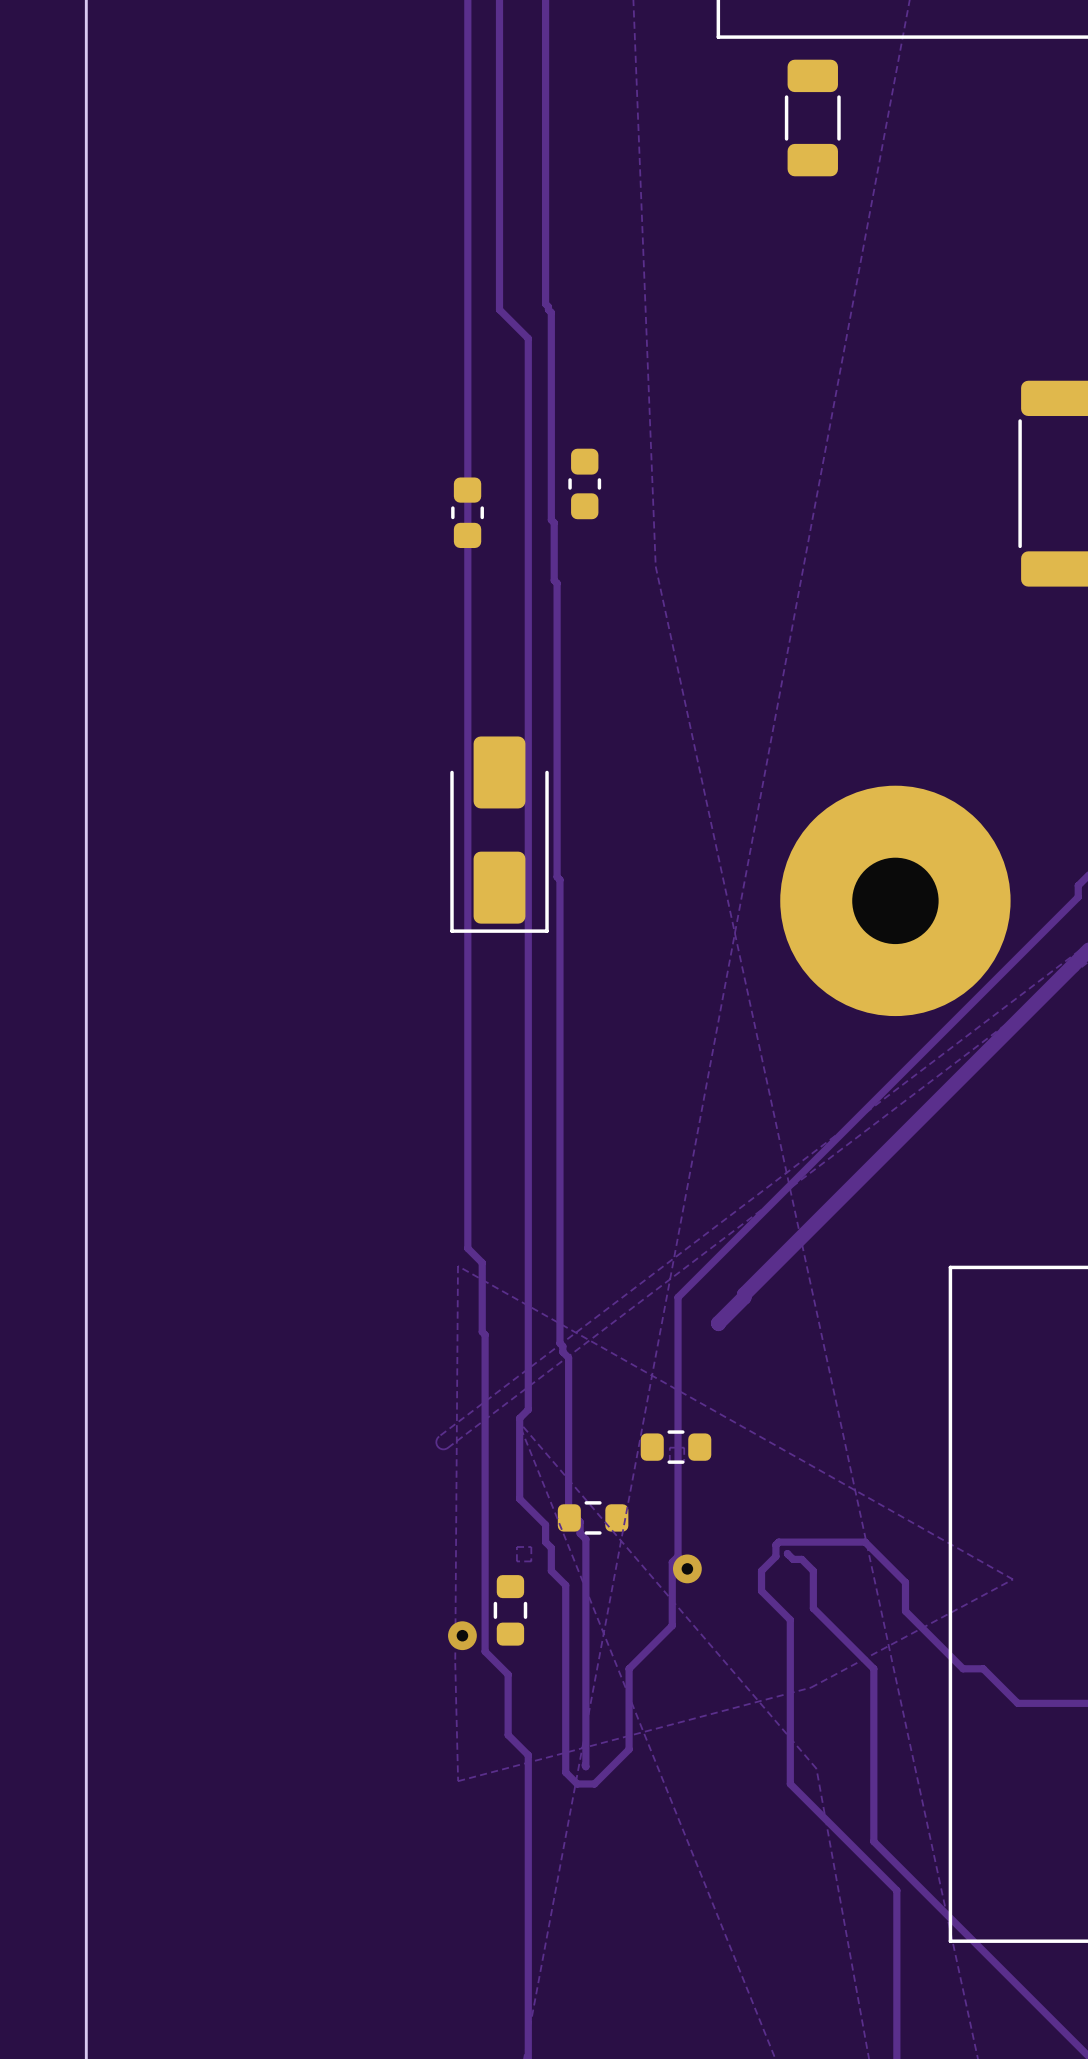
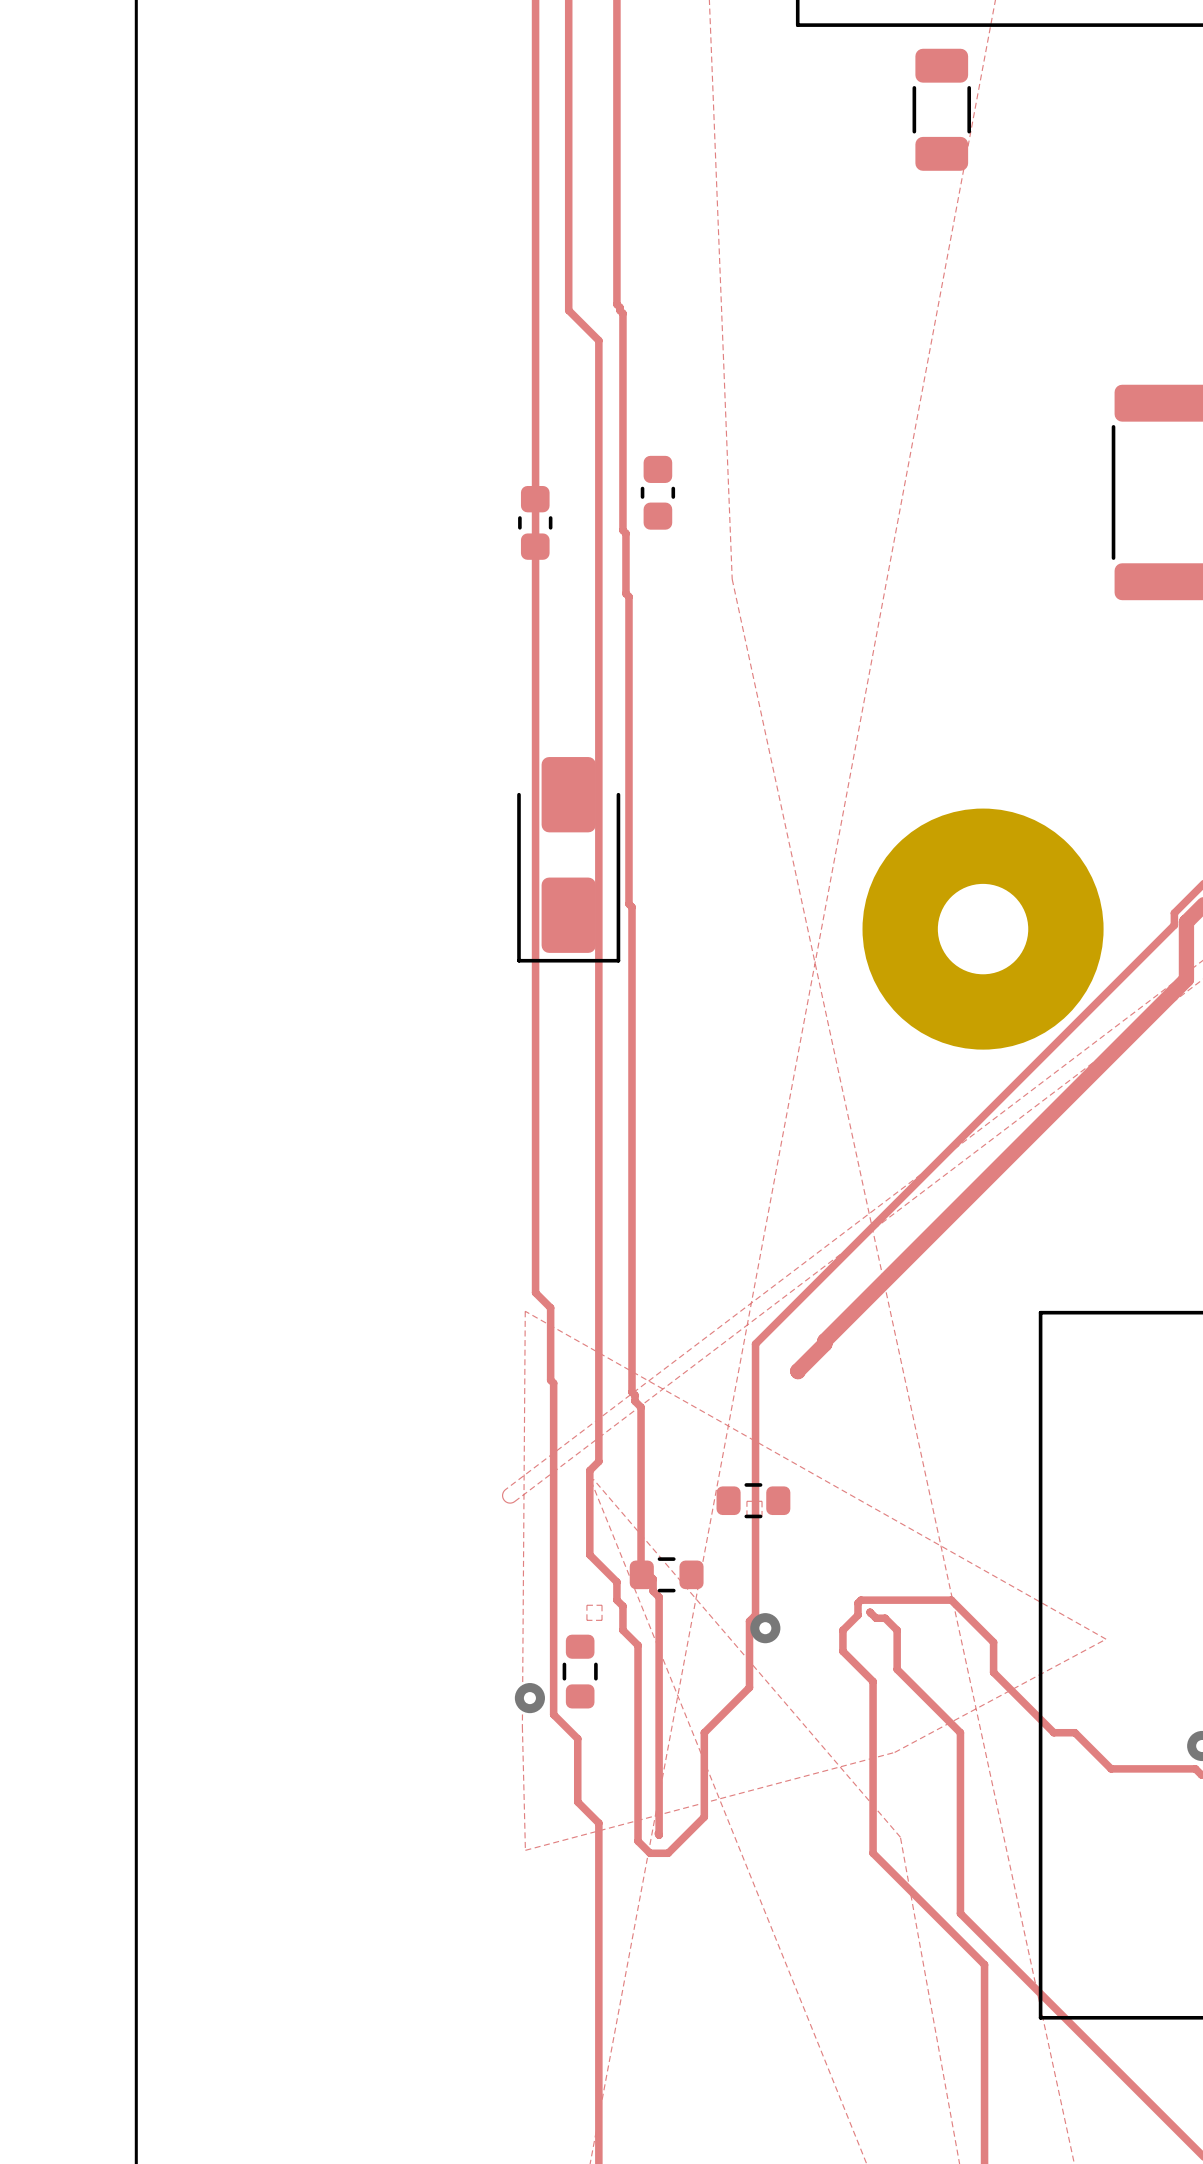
part position: (812, 117) -> (941, 109)

